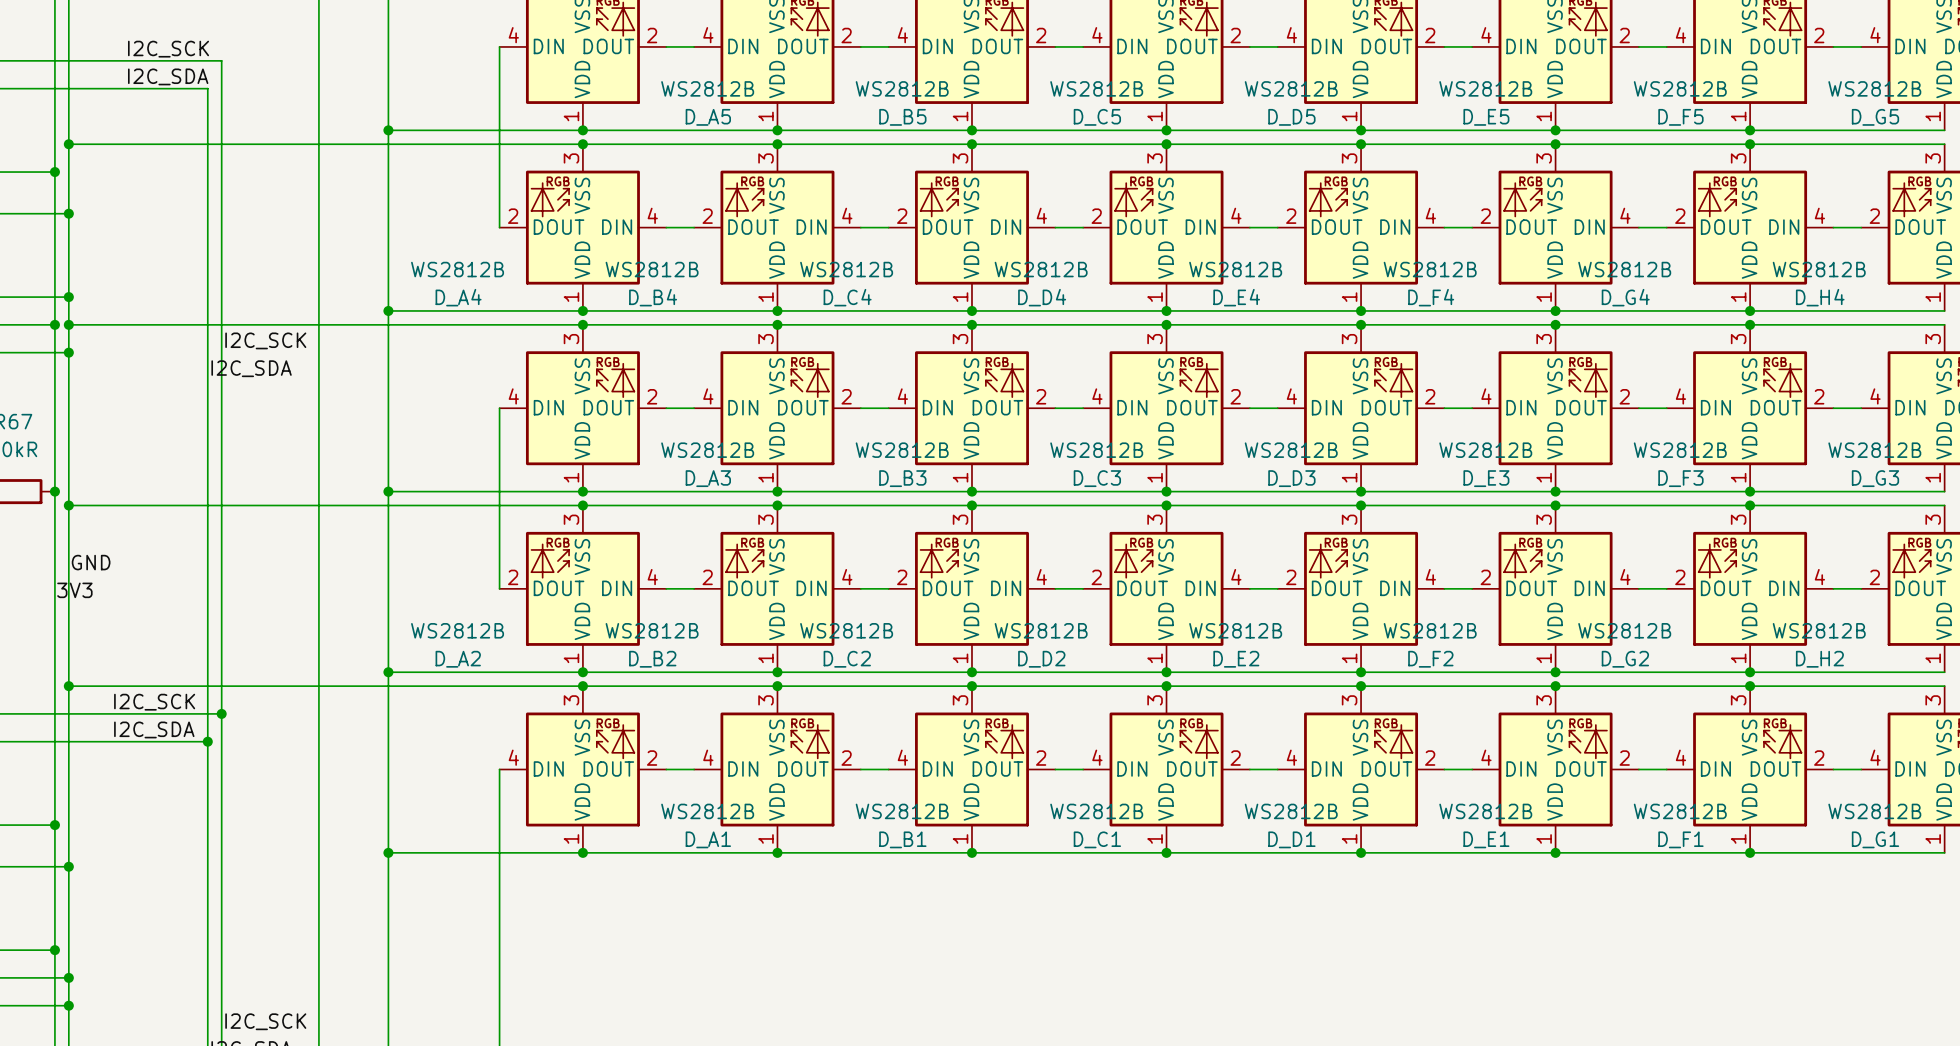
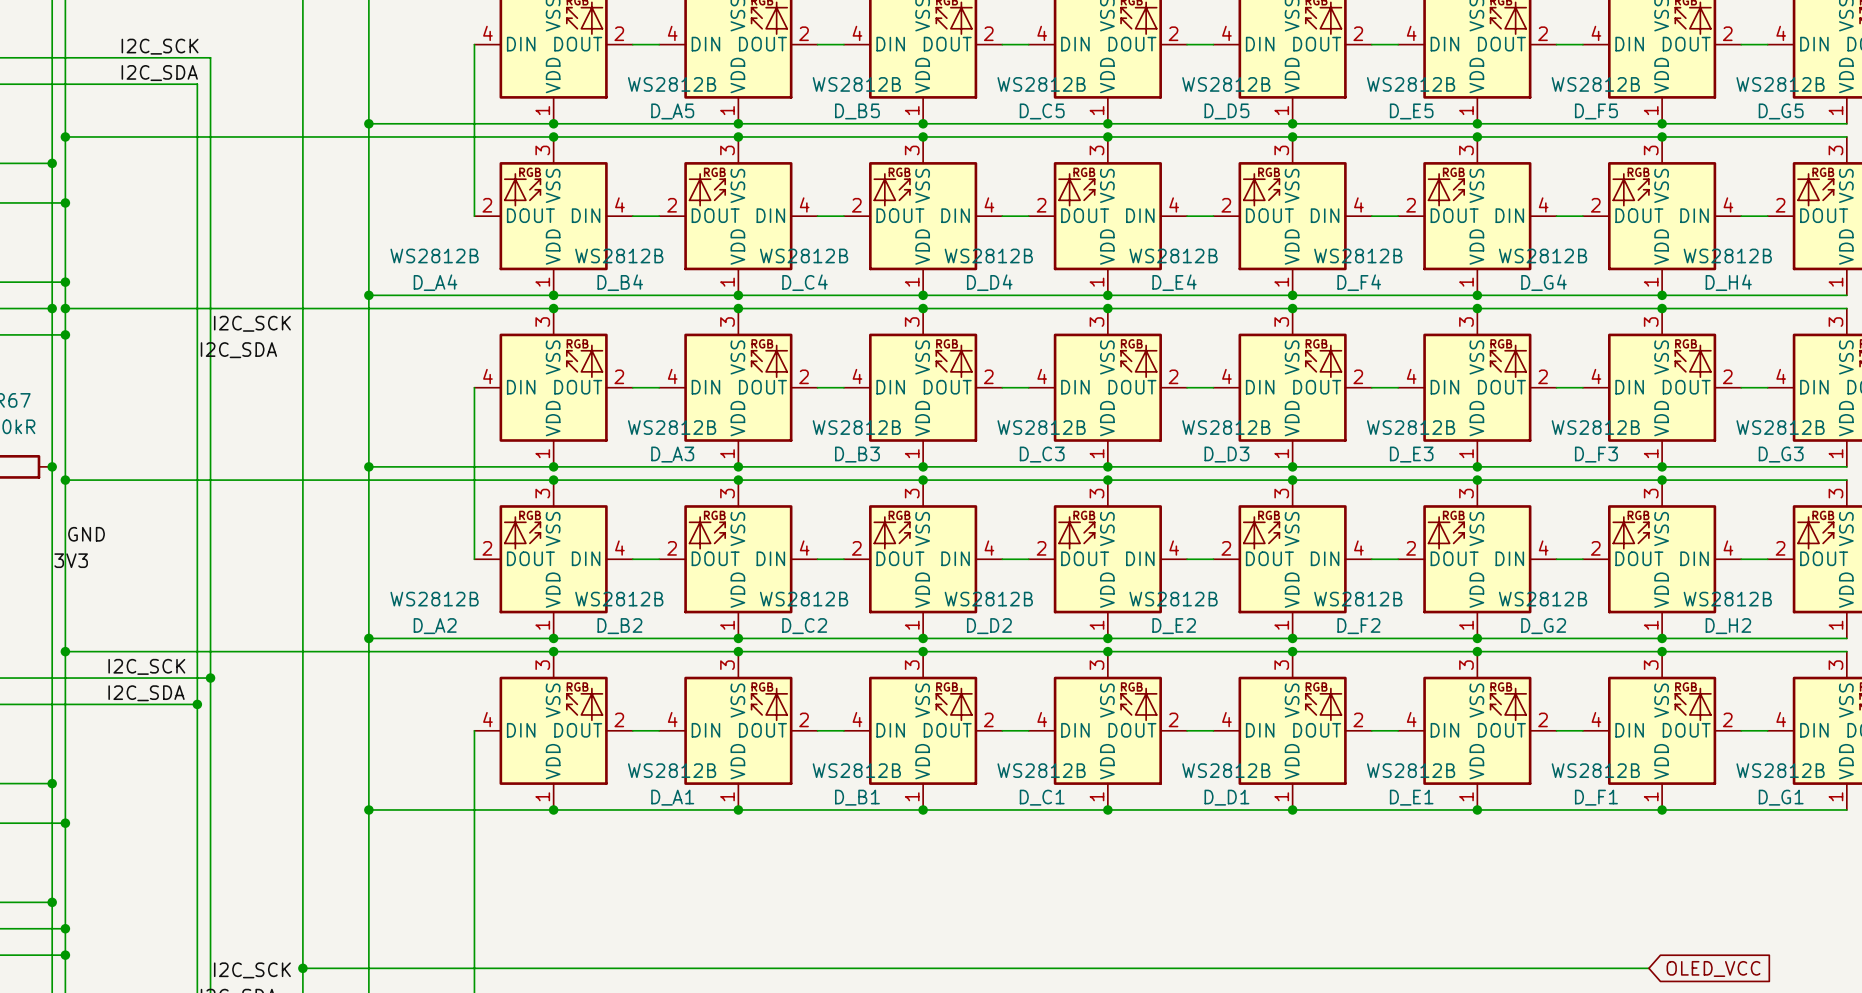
wire: none -> (302, 968) (1648, 968)
junction: none -> (302, 968)
global label: none -> OLED_VCC (1713, 968)

